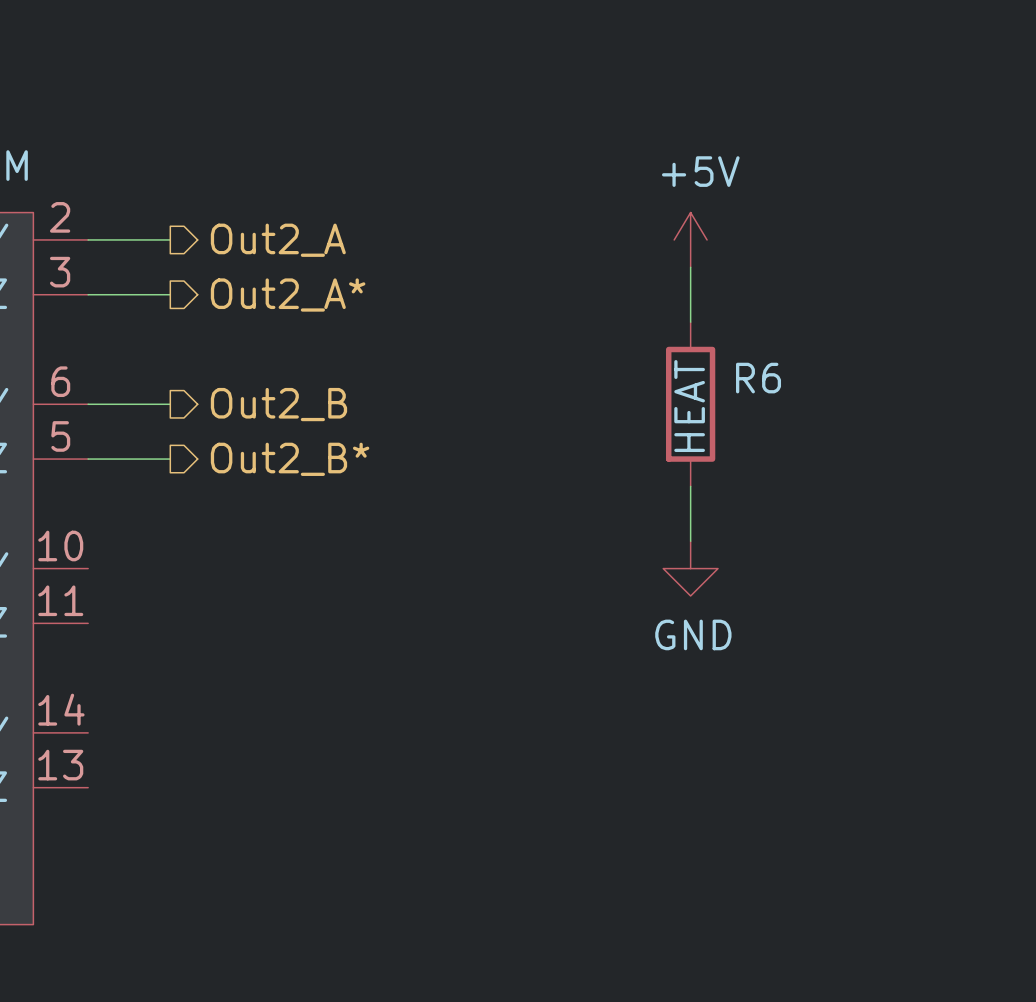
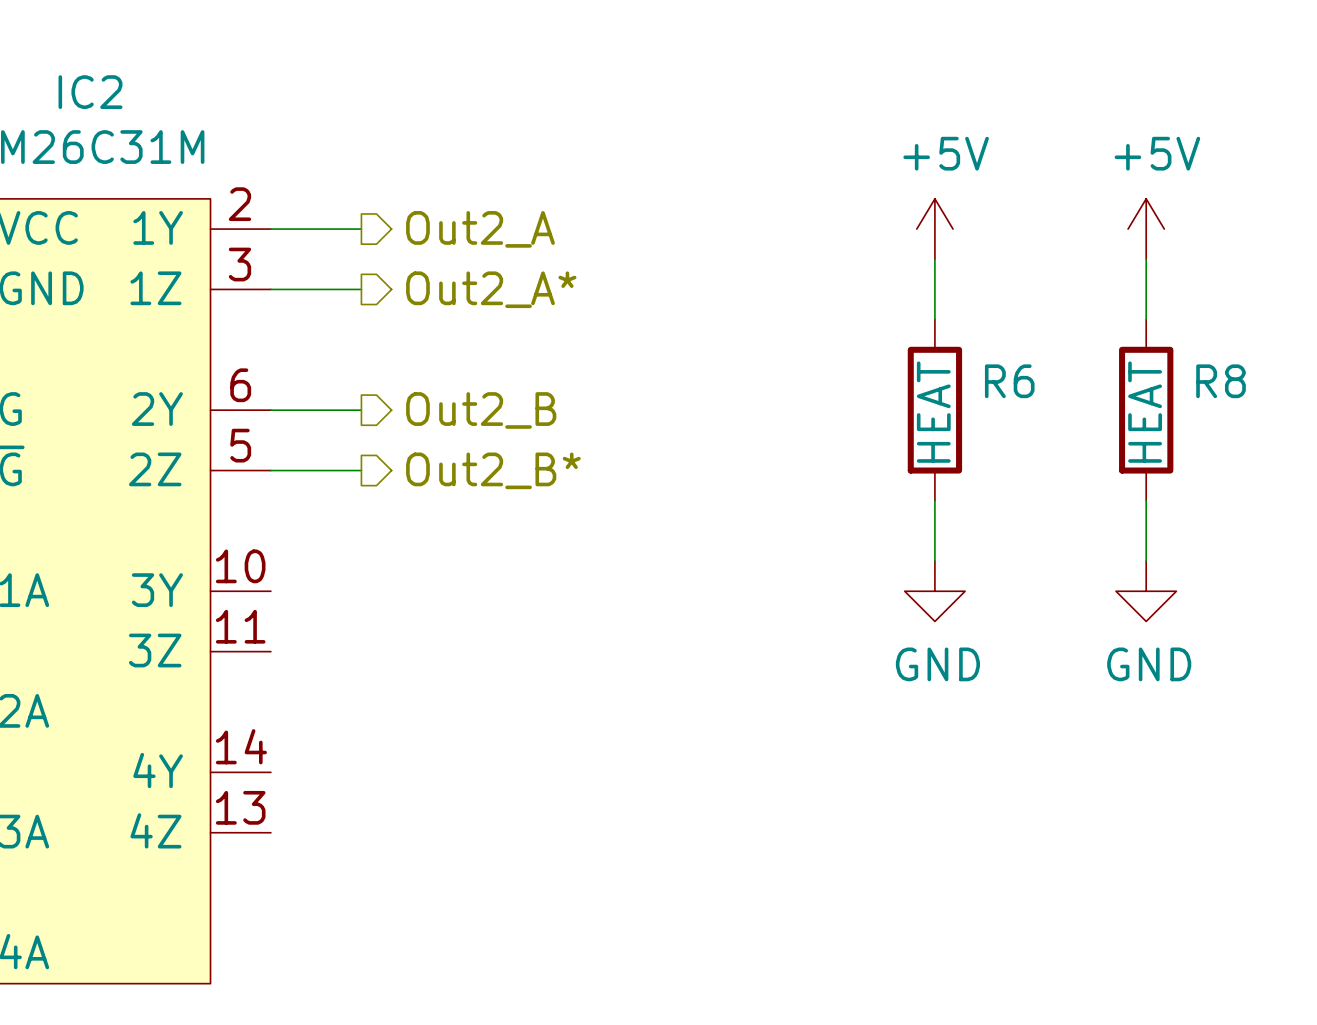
power symbol: none -> +5V (1146, 229)
wire: none -> (1146, 259) (1146, 319)
R8: none -> HEAT (1146, 410)
wire: none -> (1146, 500) (1146, 561)
power symbol: none -> GND (1146, 591)

